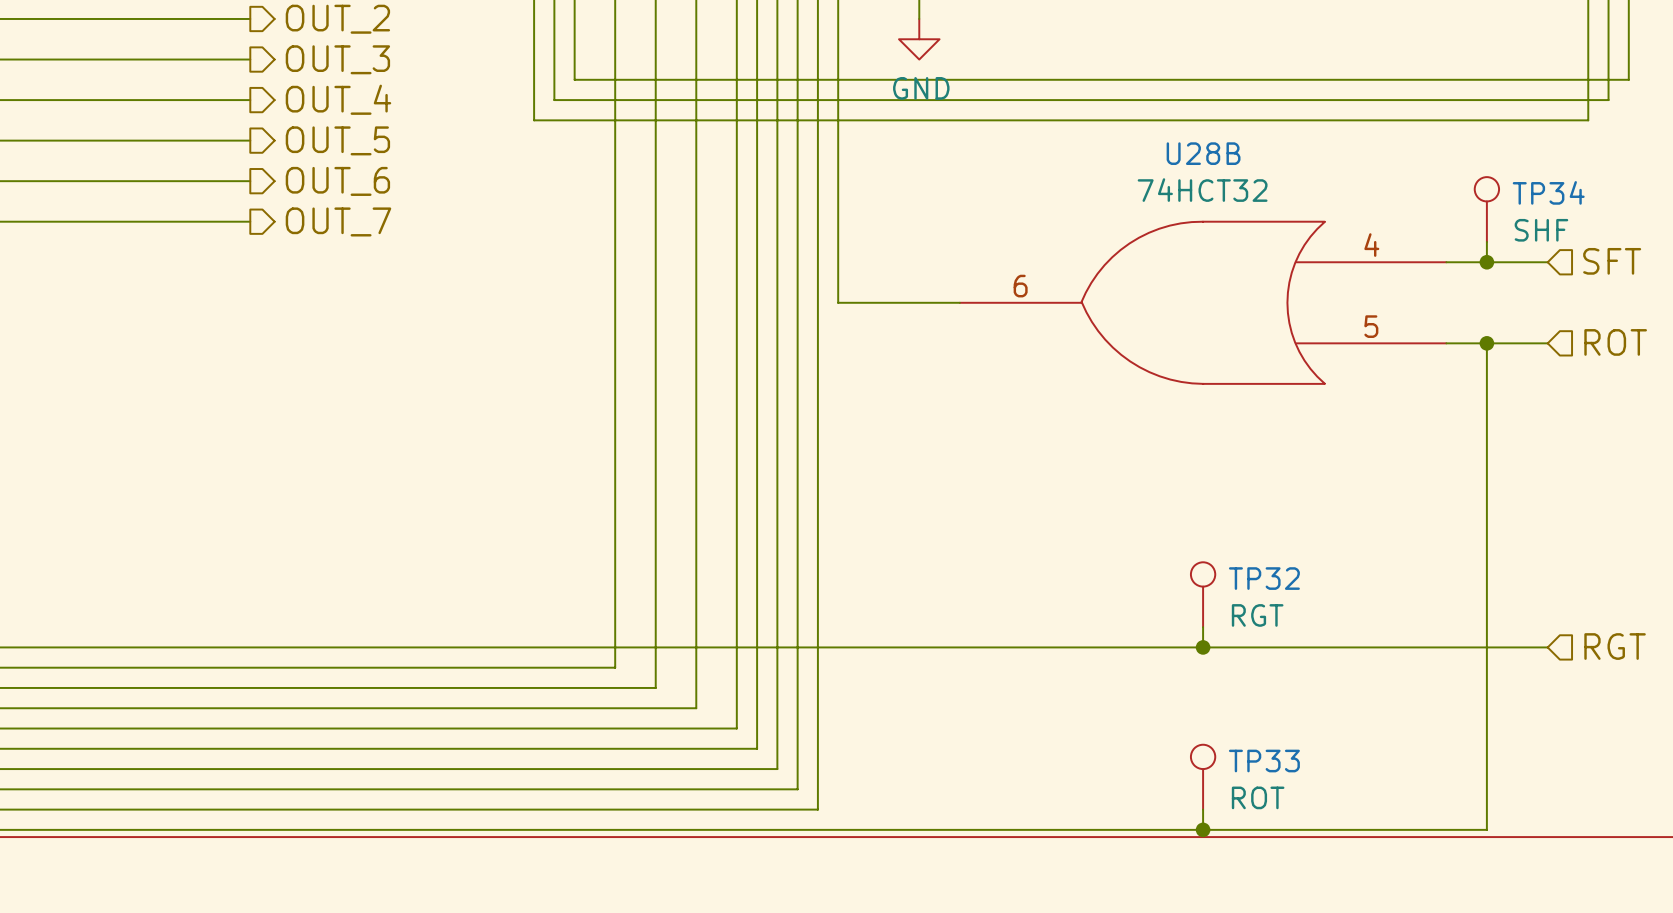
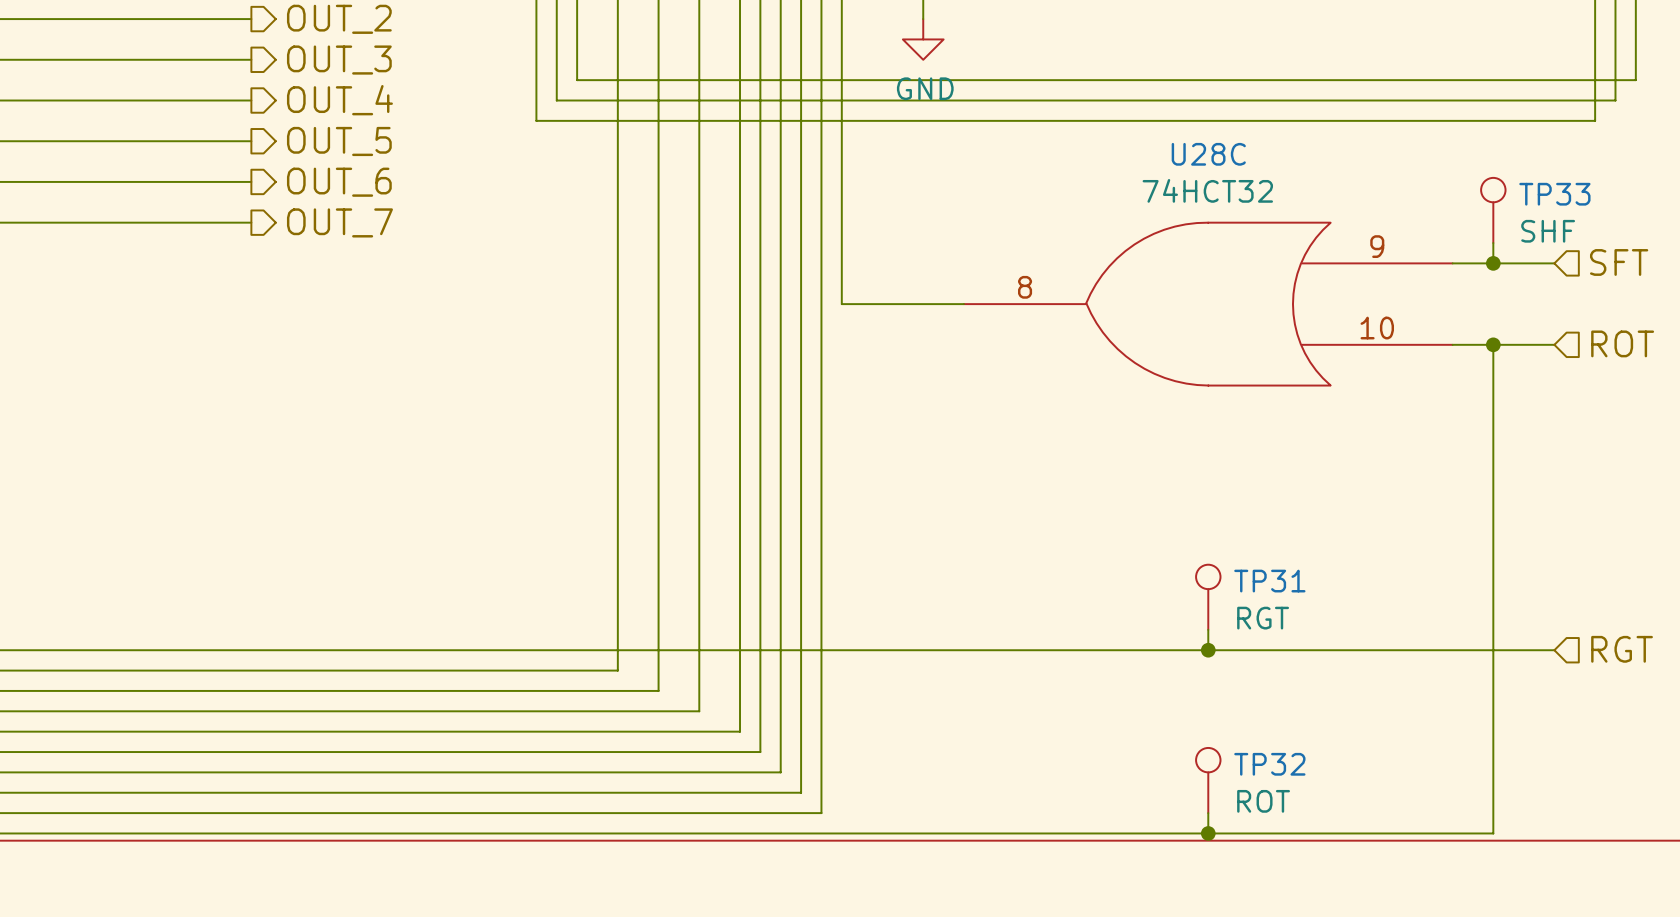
U28B name: U28B (1203, 153) -> U28C (1208, 154)
TP34 name: TP34 (1548, 192) -> TP33 (1554, 194)
U28B pin number: 4 (1371, 245) -> 9 (1377, 246)
U28B pin number: 6 (1020, 286) -> 8 (1025, 287)
U28B pin number: 5 (1371, 326) -> 10 (1377, 328)
TP32 name: TP32 (1264, 578) -> TP31 (1269, 581)
TP33 name: TP33 (1264, 761) -> TP32 (1269, 764)

